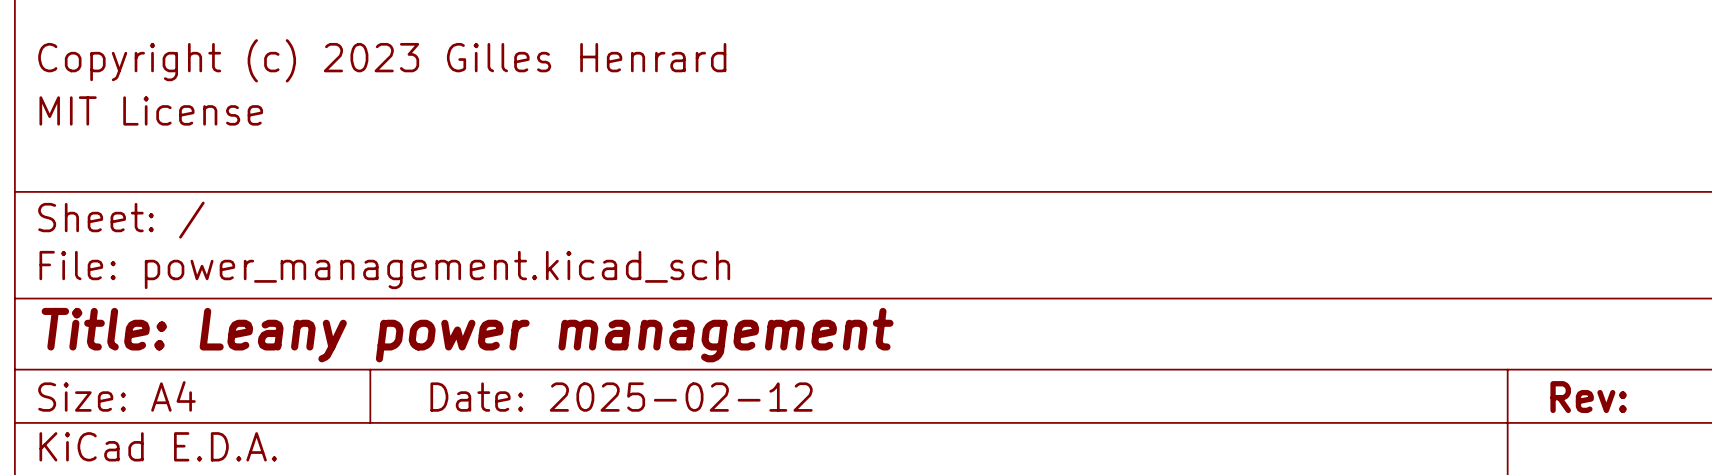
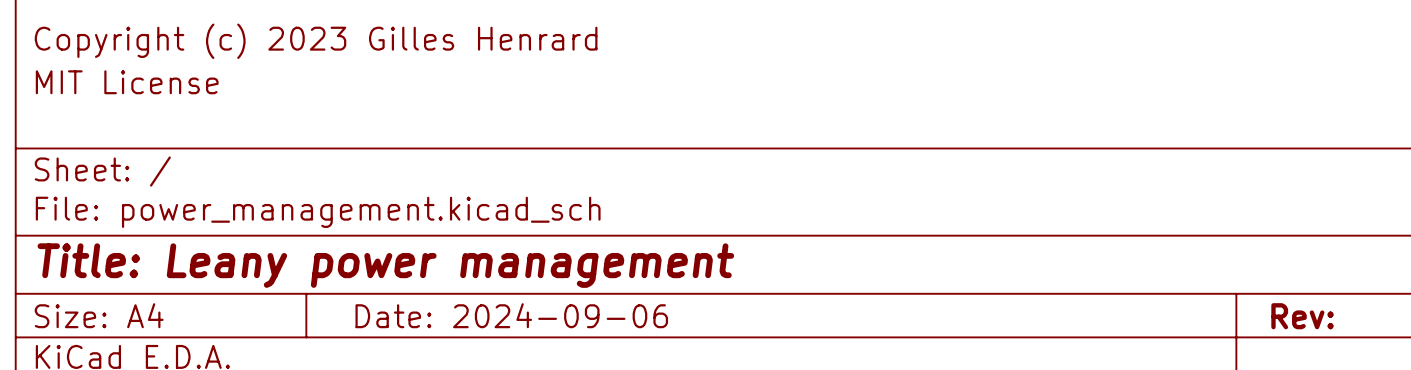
title block: Date: 2025-02-12 (621, 397) -> Date: 2024-09-06 (511, 315)

